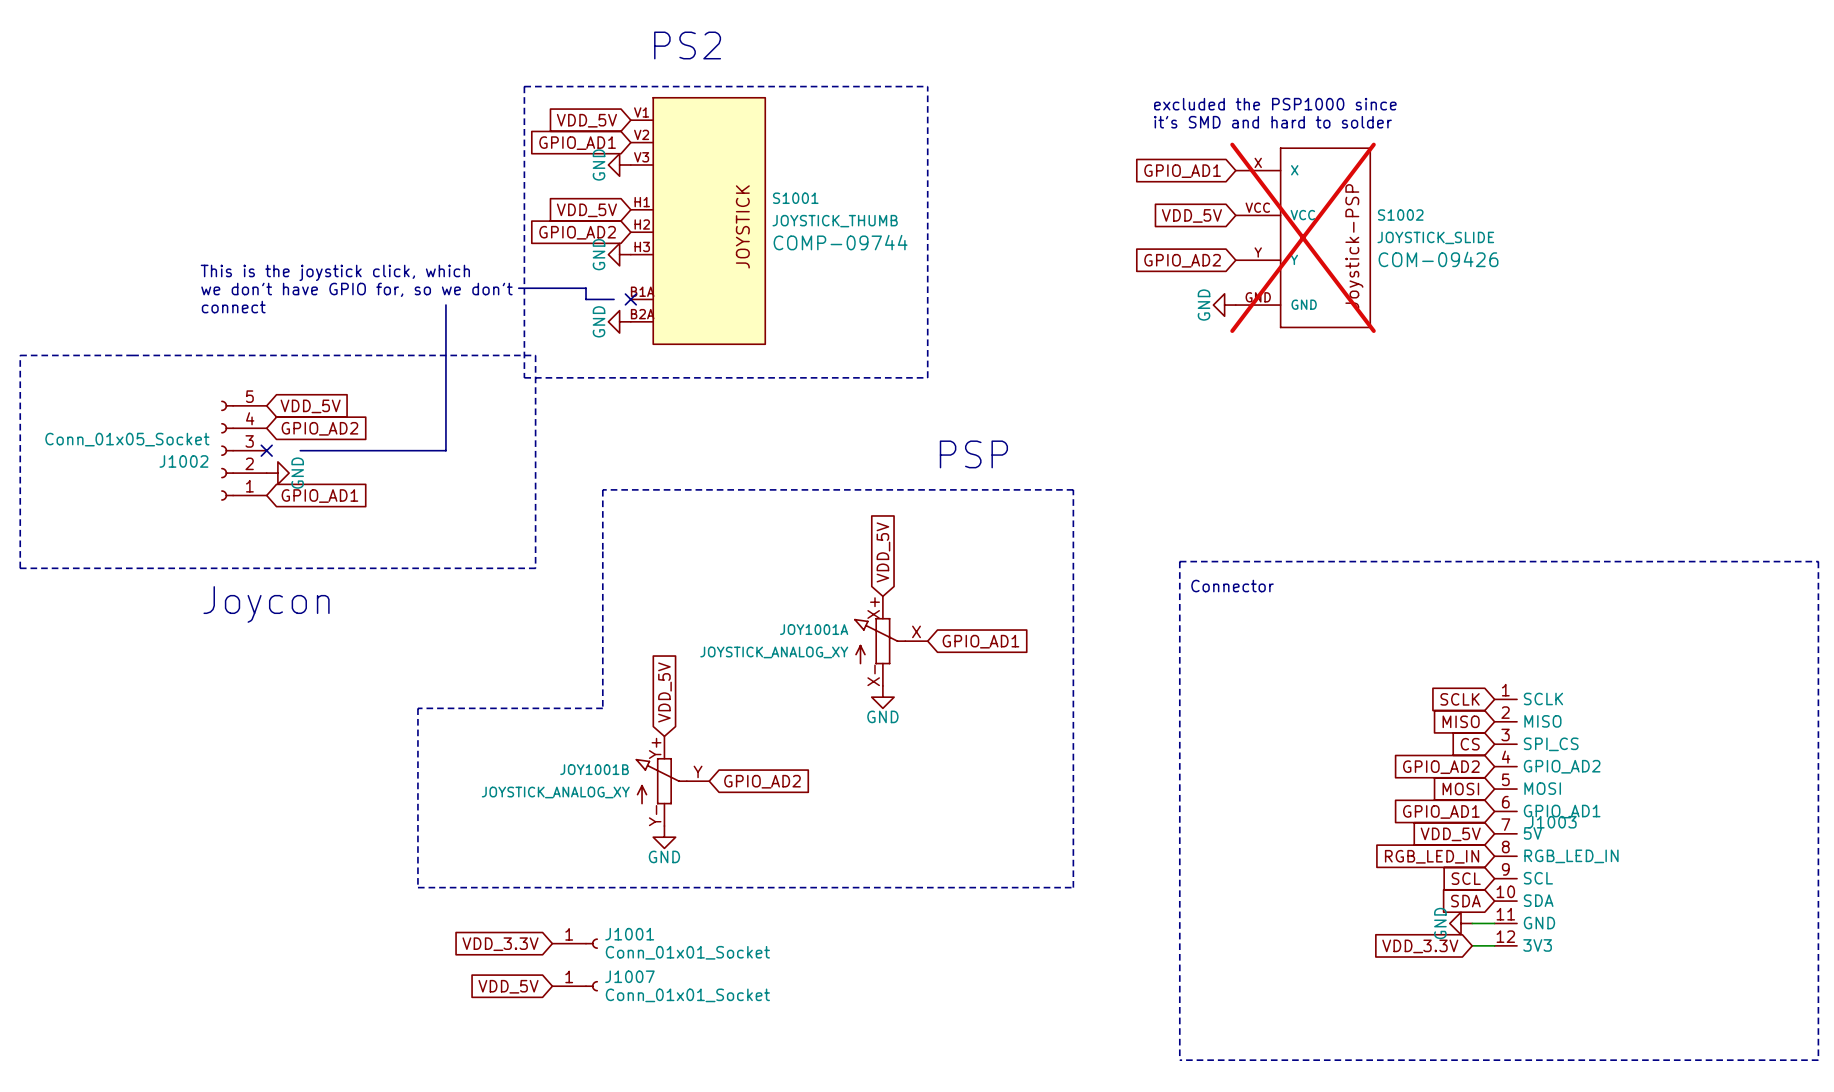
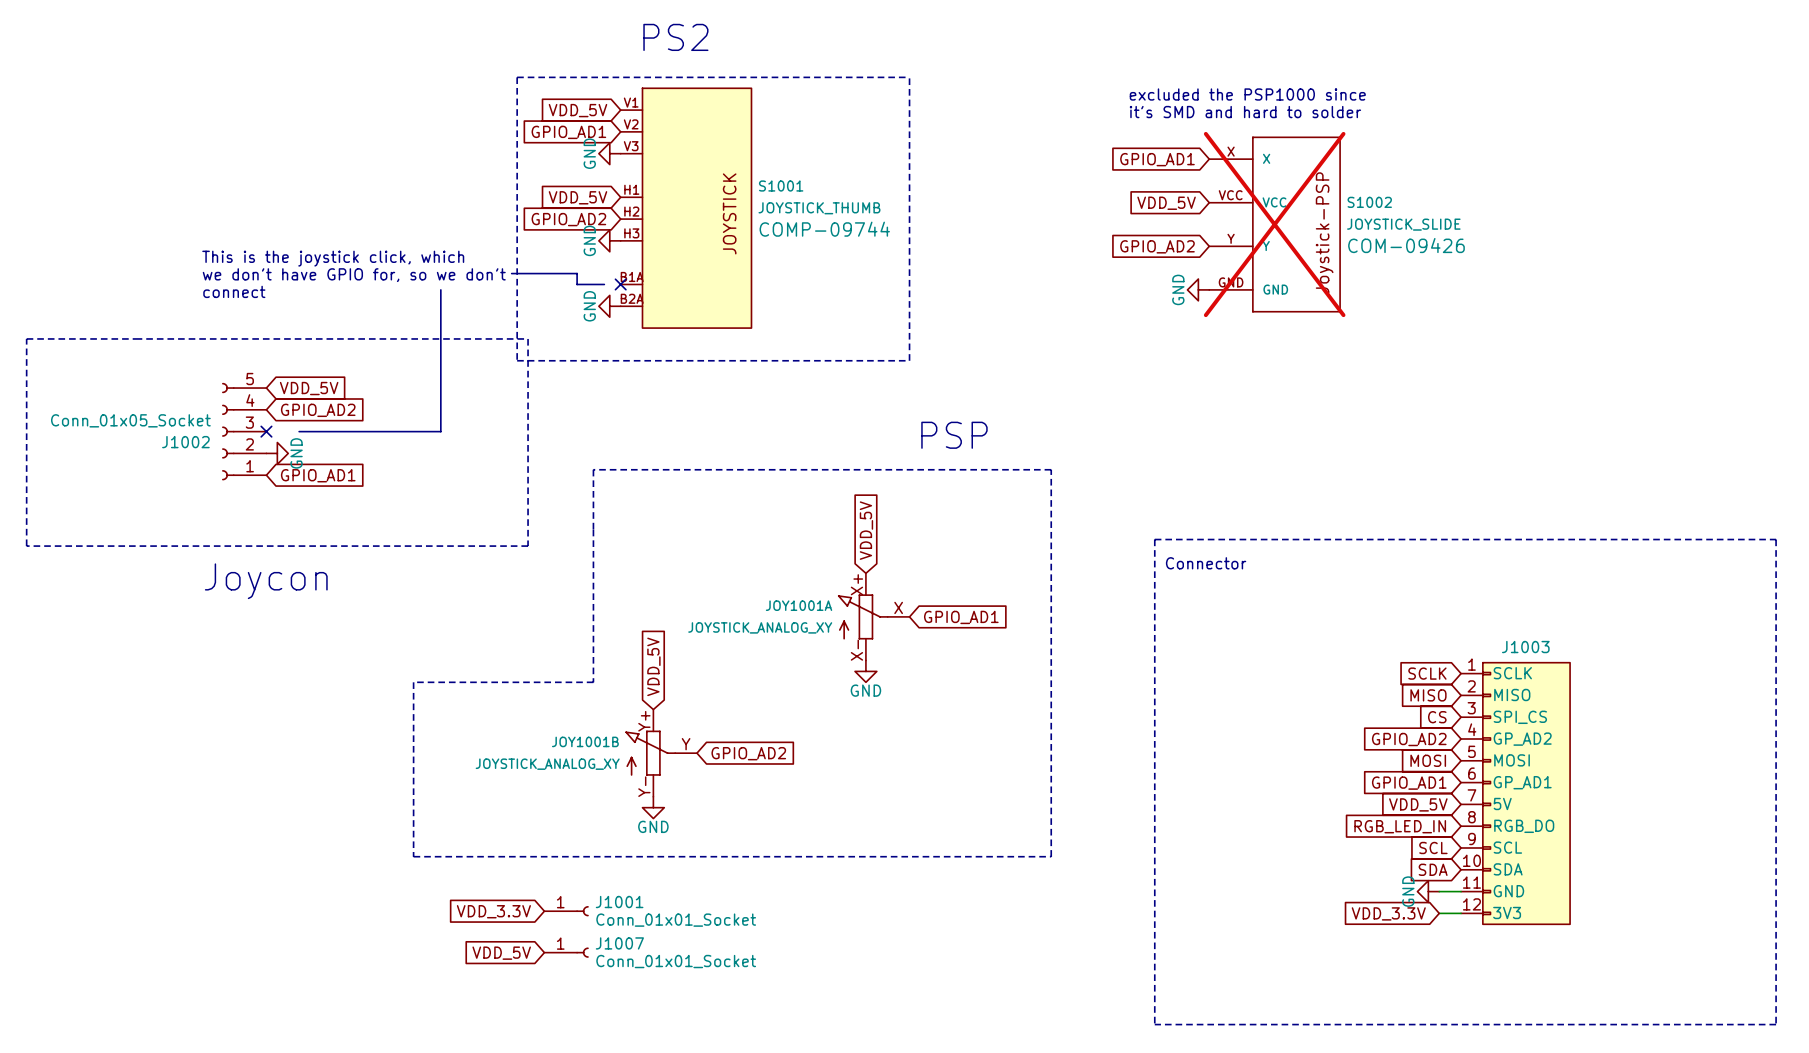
J1003 symbol: [1494, 699, 1518, 946] -> [1461, 662, 1571, 925]
J1003 name position: J1003 (1552, 822) -> J1003 (1525, 647)

